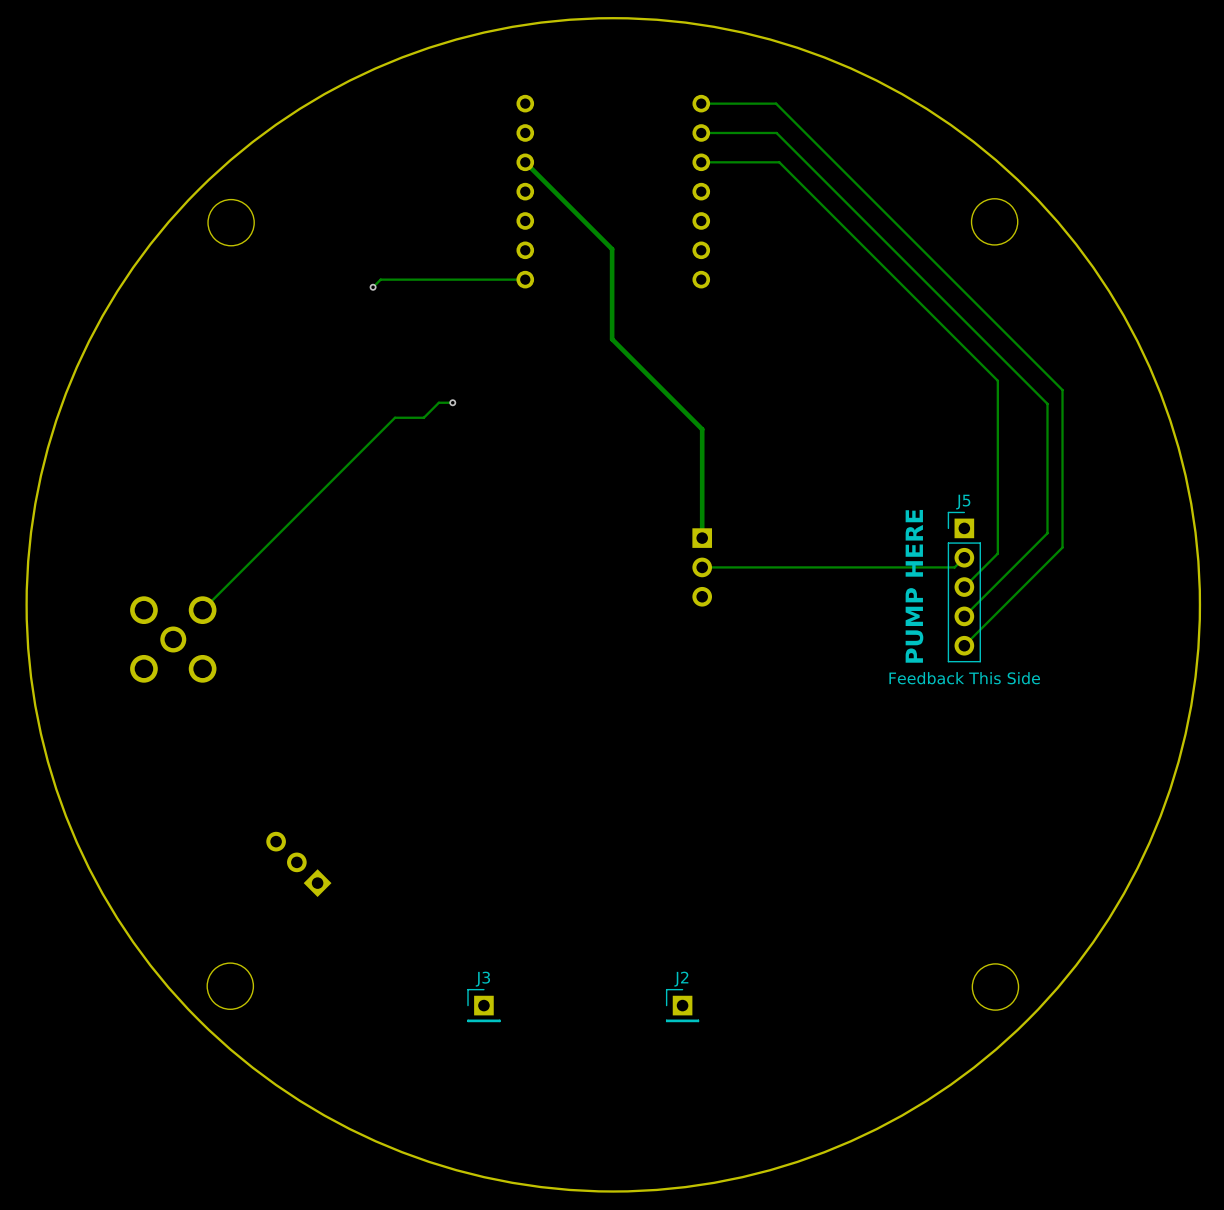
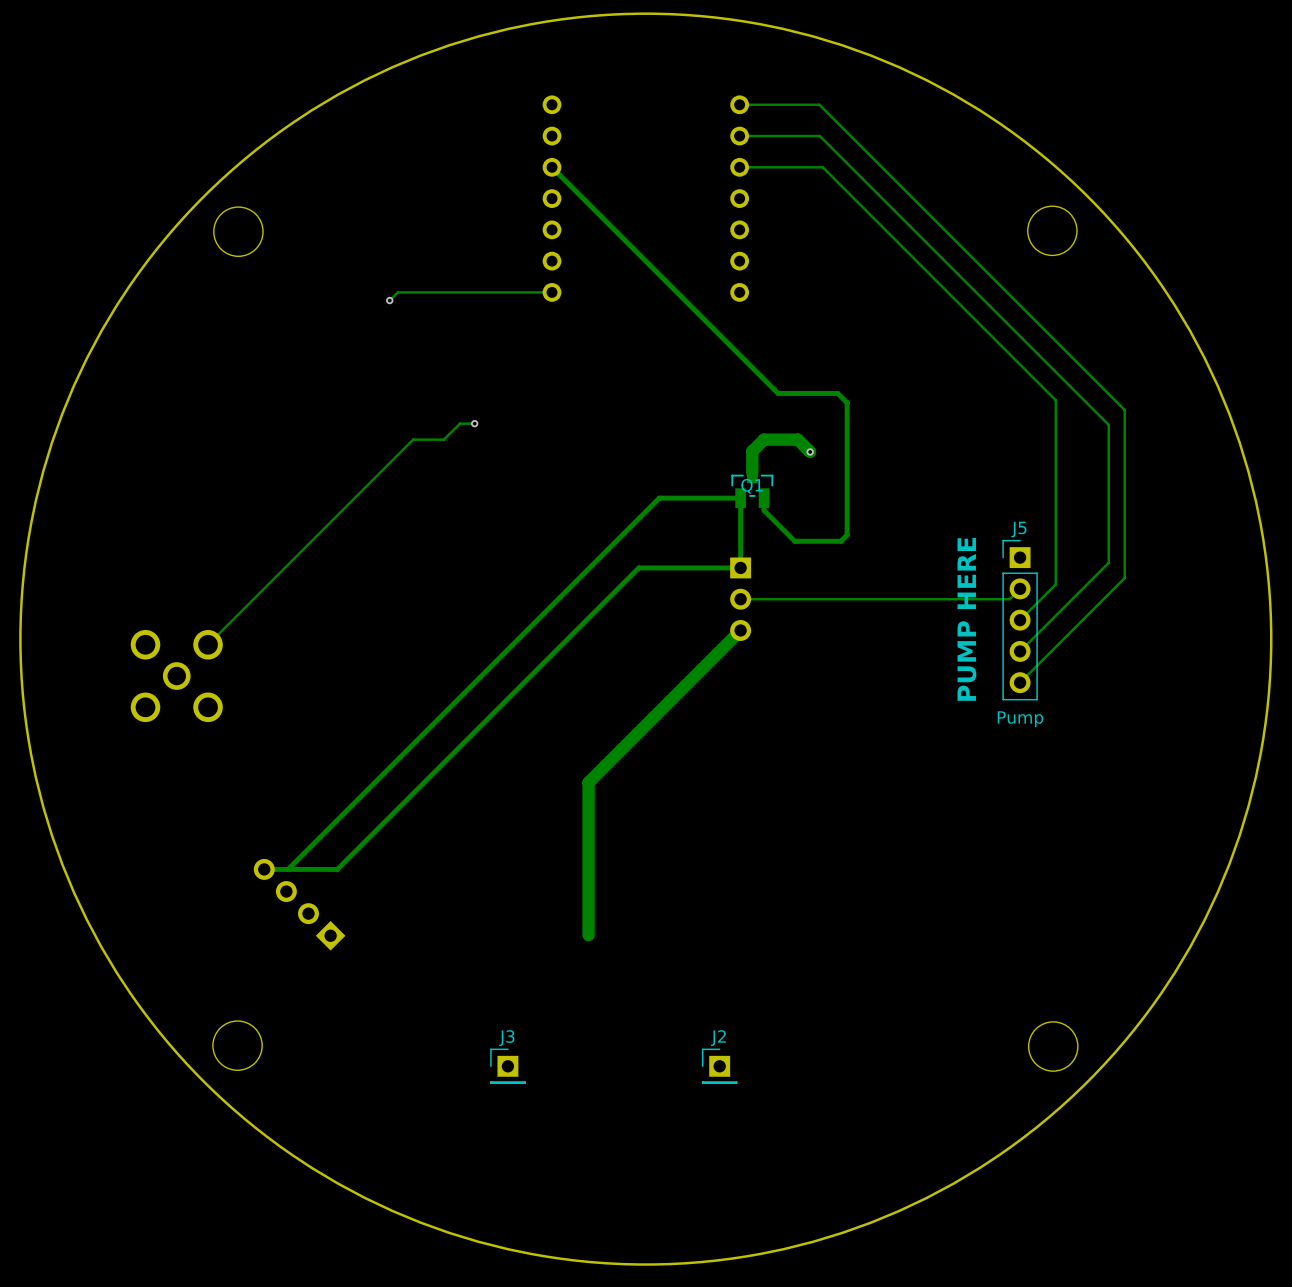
track: (612, 249) (612, 339) (702, 429) (702, 472) -> (644, 259) (778, 393) (837, 393) (847, 402) (847, 535) (840, 541) (794, 541) (764, 510) (764, 498)
track: none -> (810, 451) (797, 439) (764, 439) (752, 451) (752, 473)
via: none -> (810, 451)
Q1: none -> (752, 485)
track: none -> (740, 498) (659, 498) (288, 869)
track: none -> (740, 567) (638, 567) (337, 869) (264, 869)
track: none -> (740, 630) (588, 782) (588, 935)
J5 value: Feedback This Side (964, 678) -> Pump (1020, 719)
part: none -> (299, 904)

